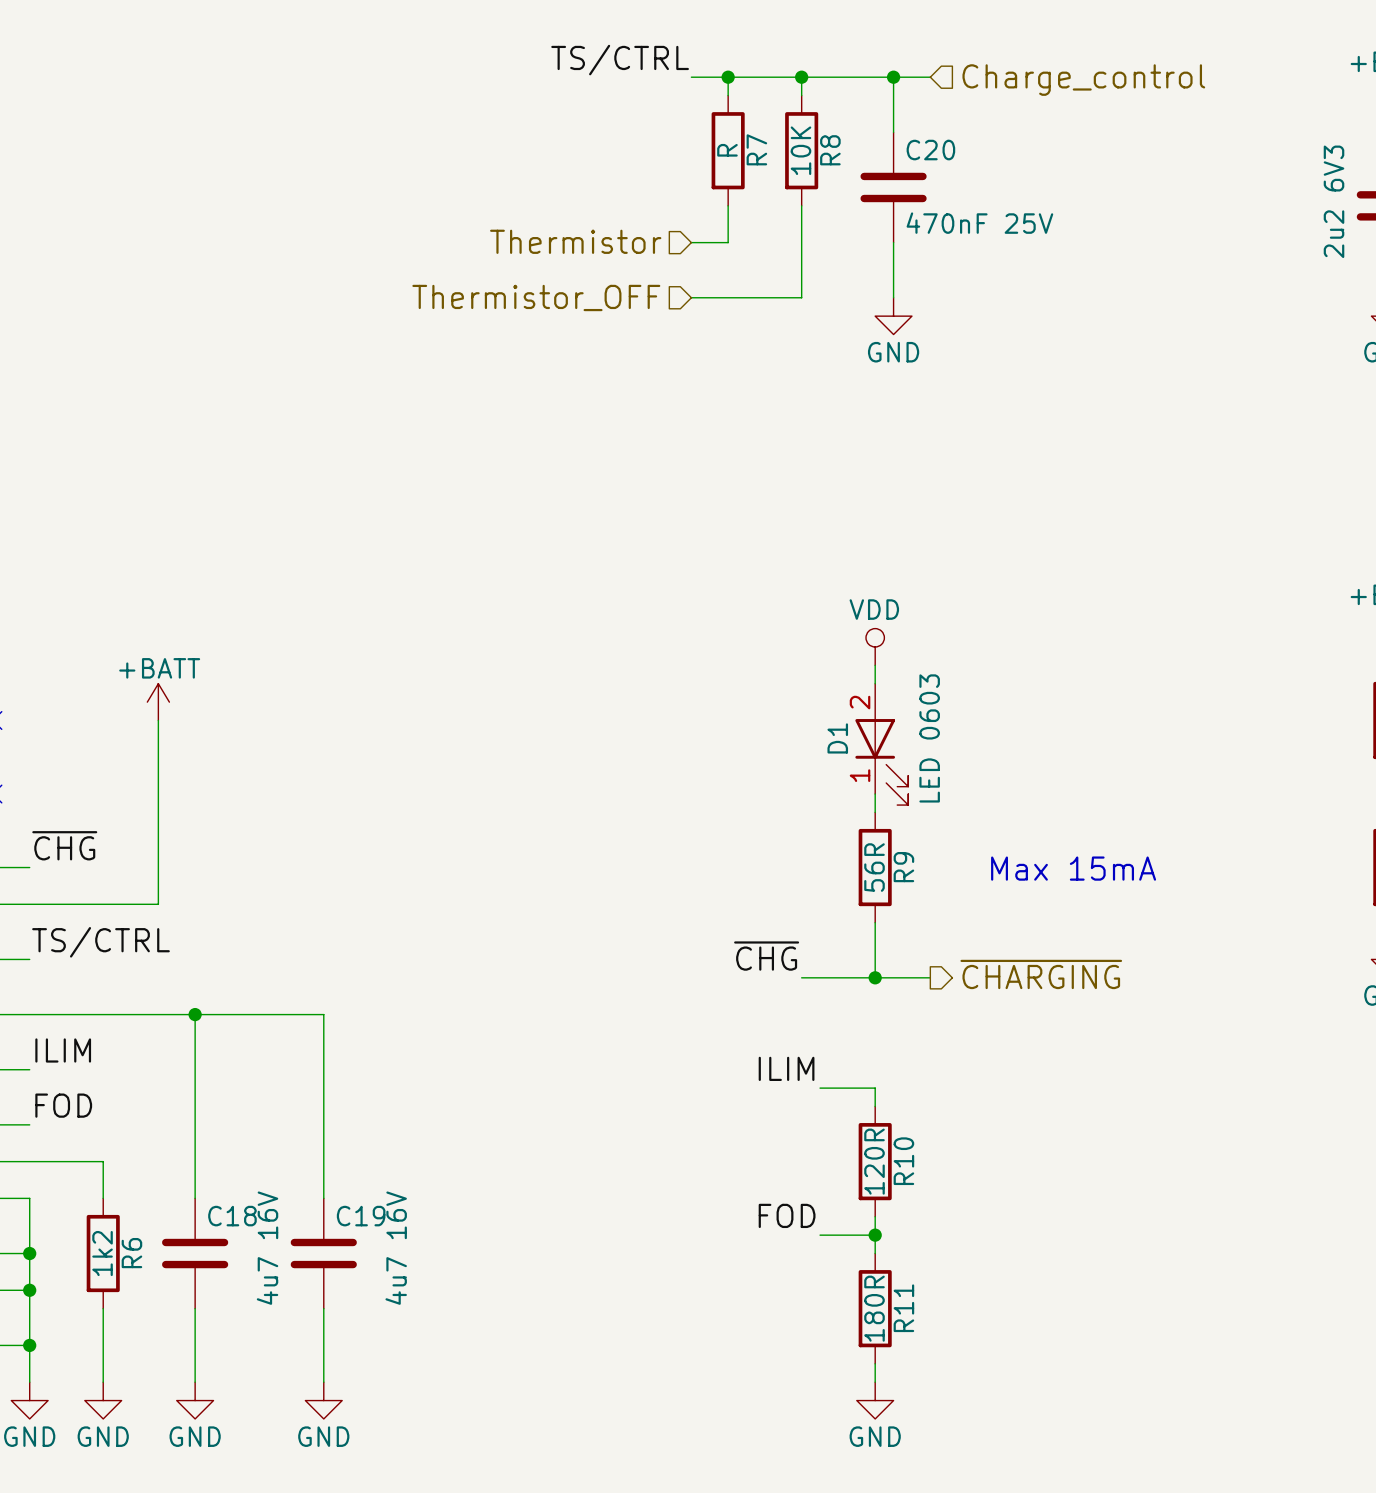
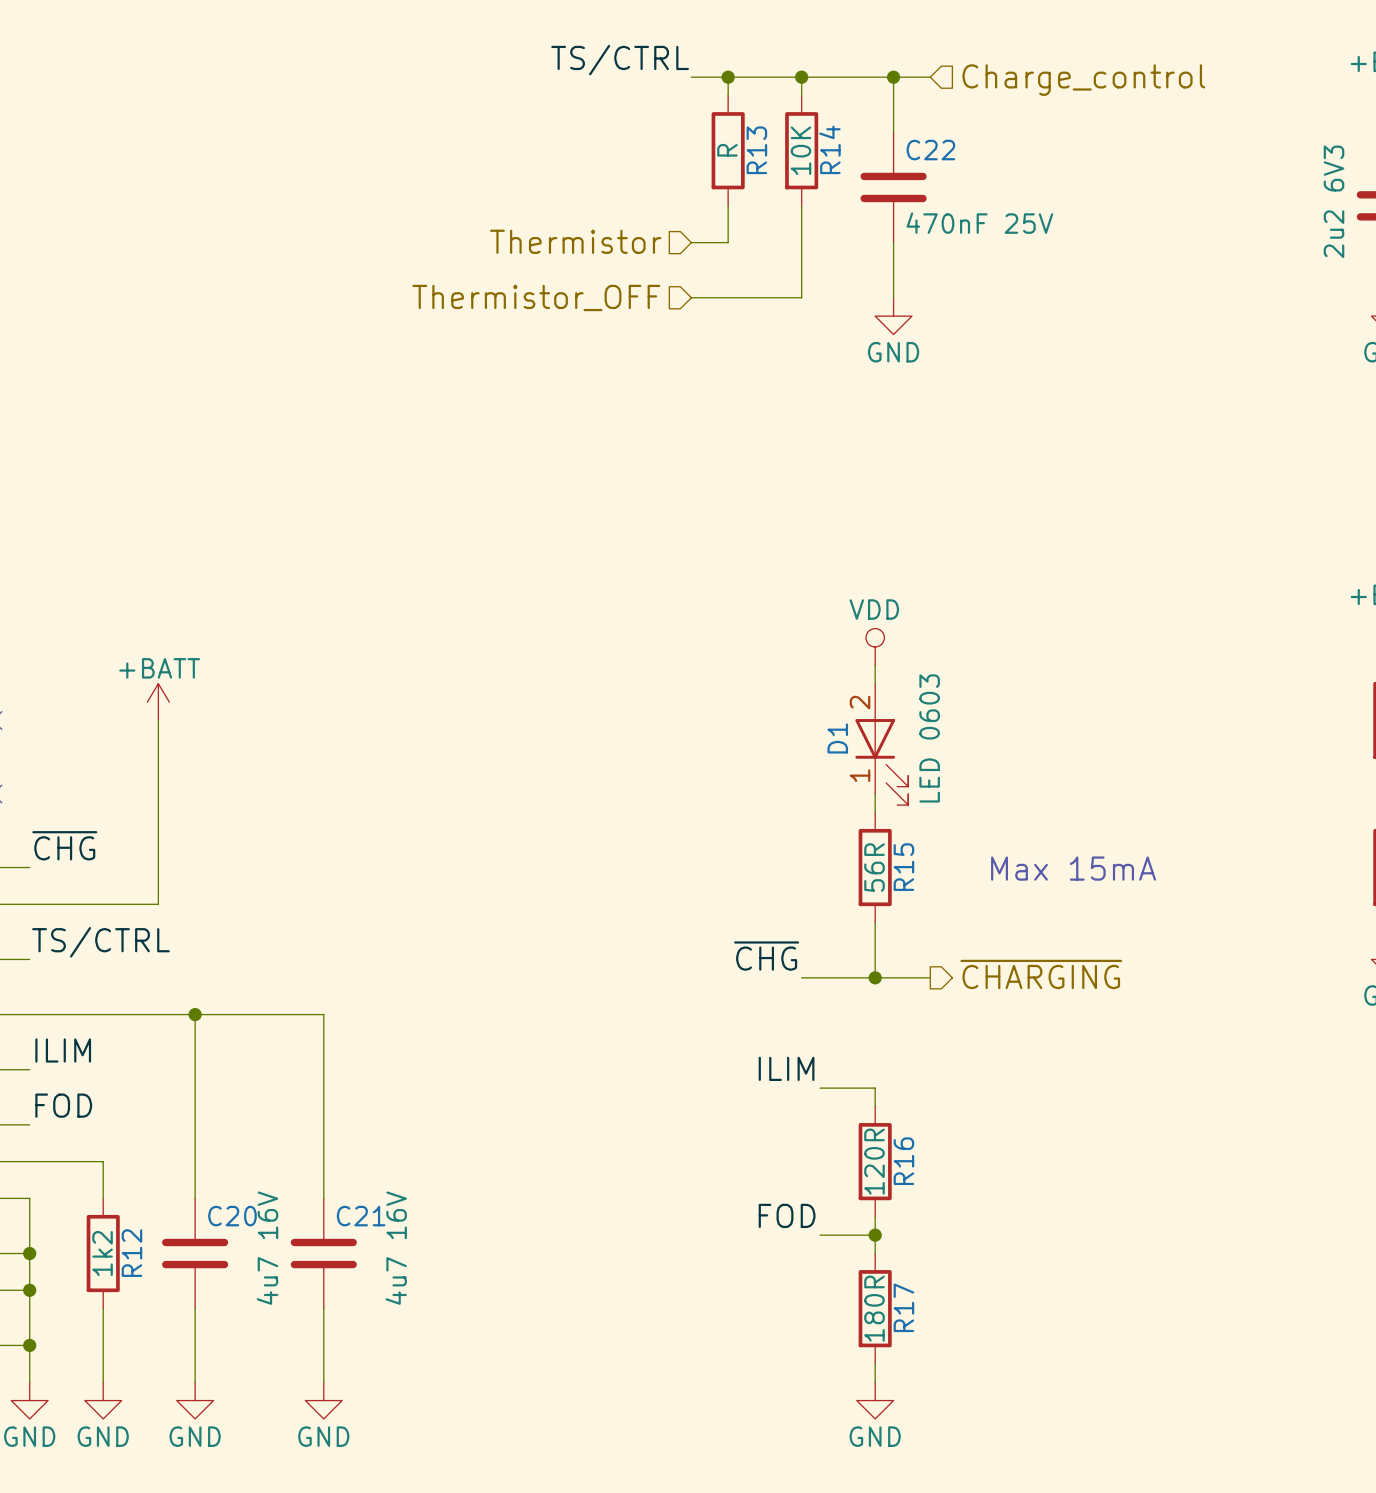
R7 name: R7 (756, 149) -> R13 (756, 150)
R8 name: R8 (830, 150) -> R14 (829, 149)
C20 name: C20 (930, 150) -> C22 (930, 150)
R9 name: R9 (903, 867) -> R15 (903, 867)
R10 name: R10 (903, 1161) -> R16 (903, 1161)
C18 name: C18 (232, 1216) -> C20 (232, 1216)
C19 name: C19 (361, 1216) -> C21 (361, 1216)
R6 name: R6 (131, 1253) -> R12 (131, 1253)
R11 name: R11 (903, 1308) -> R17 (903, 1307)

